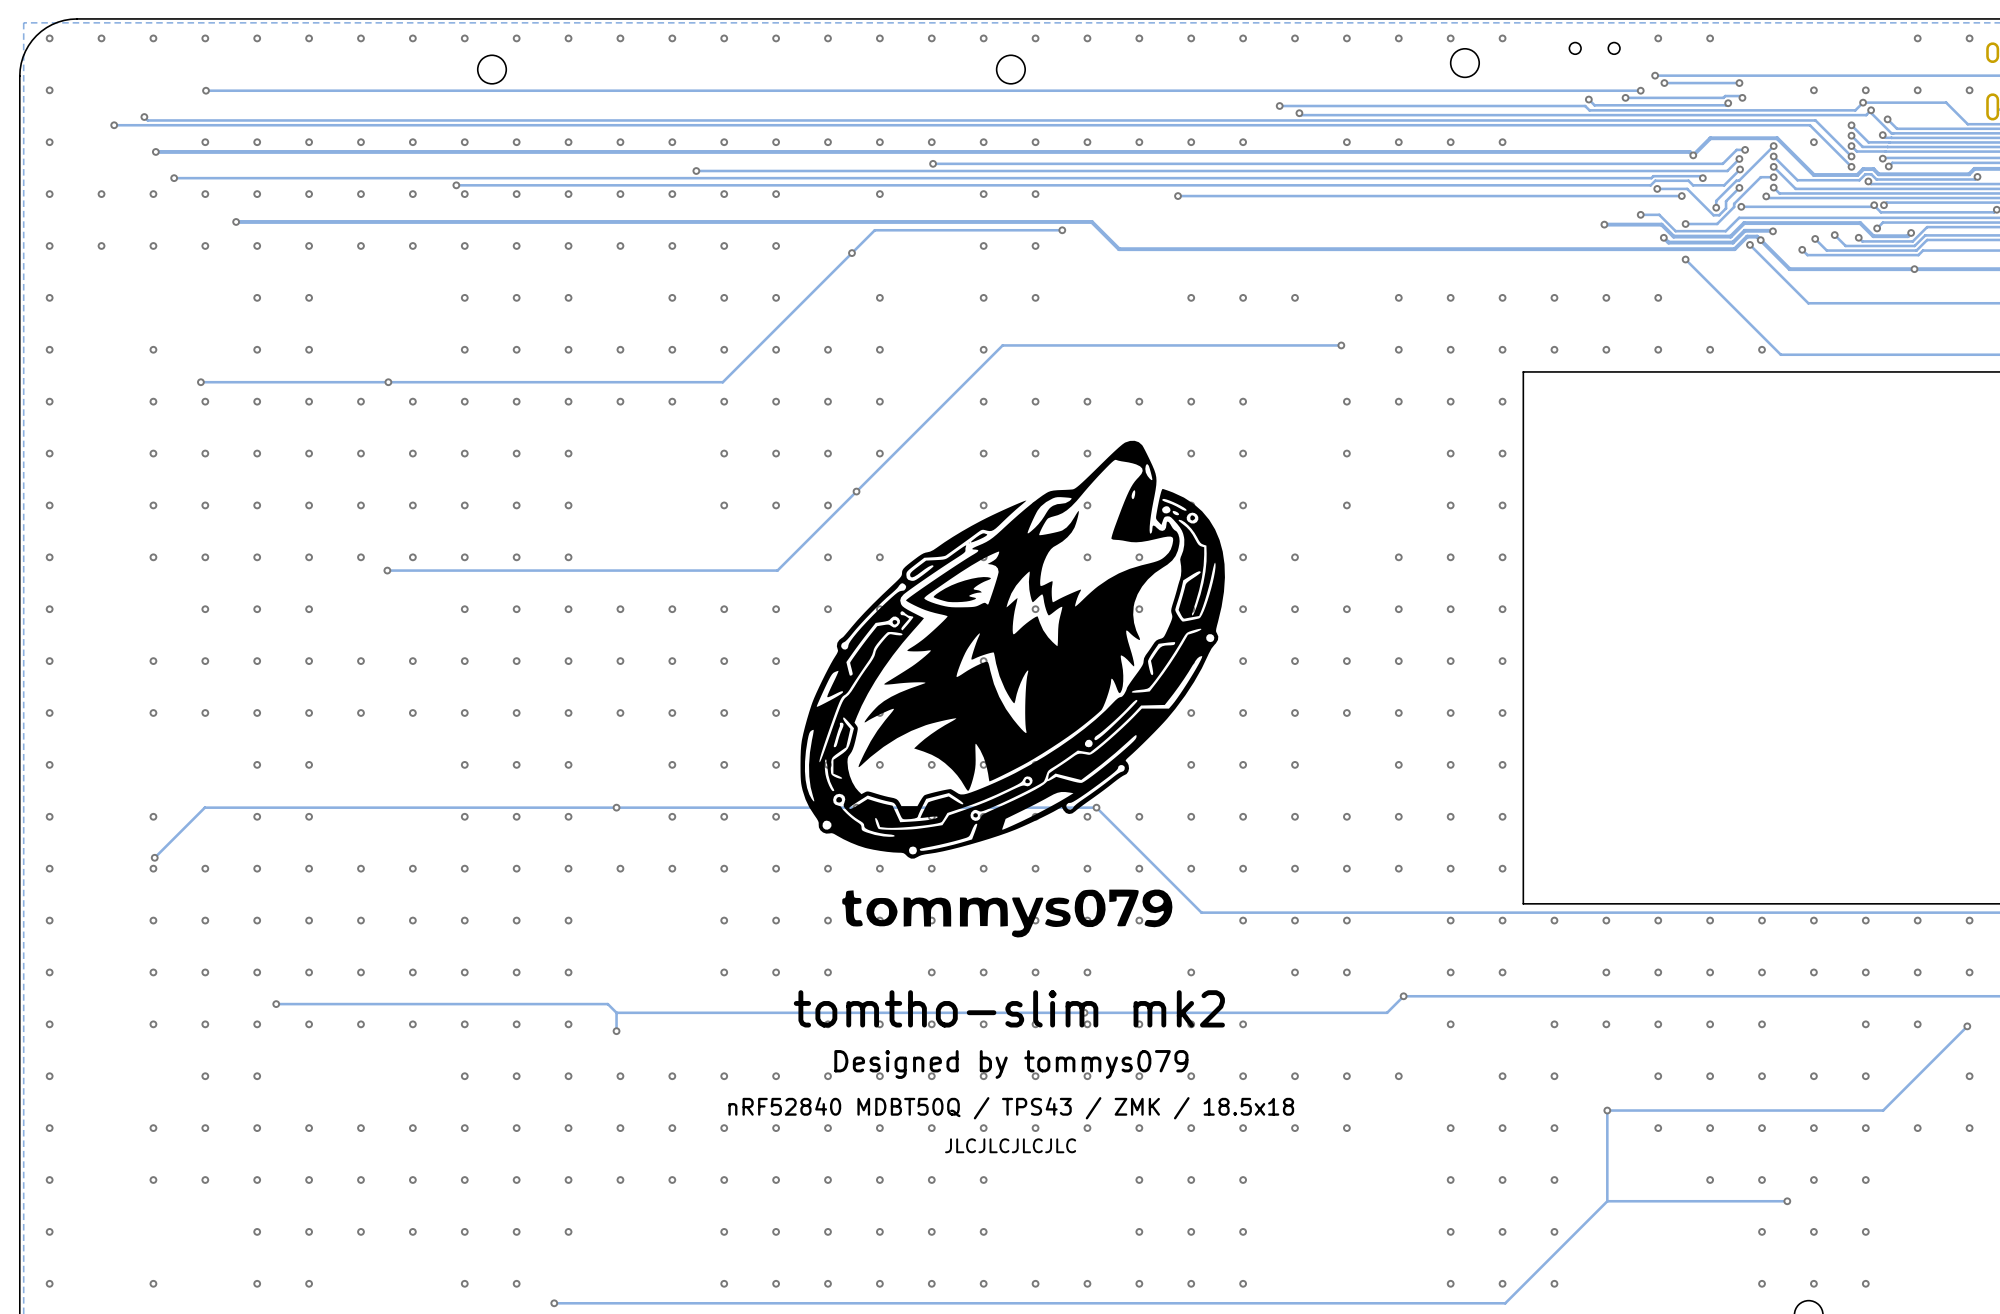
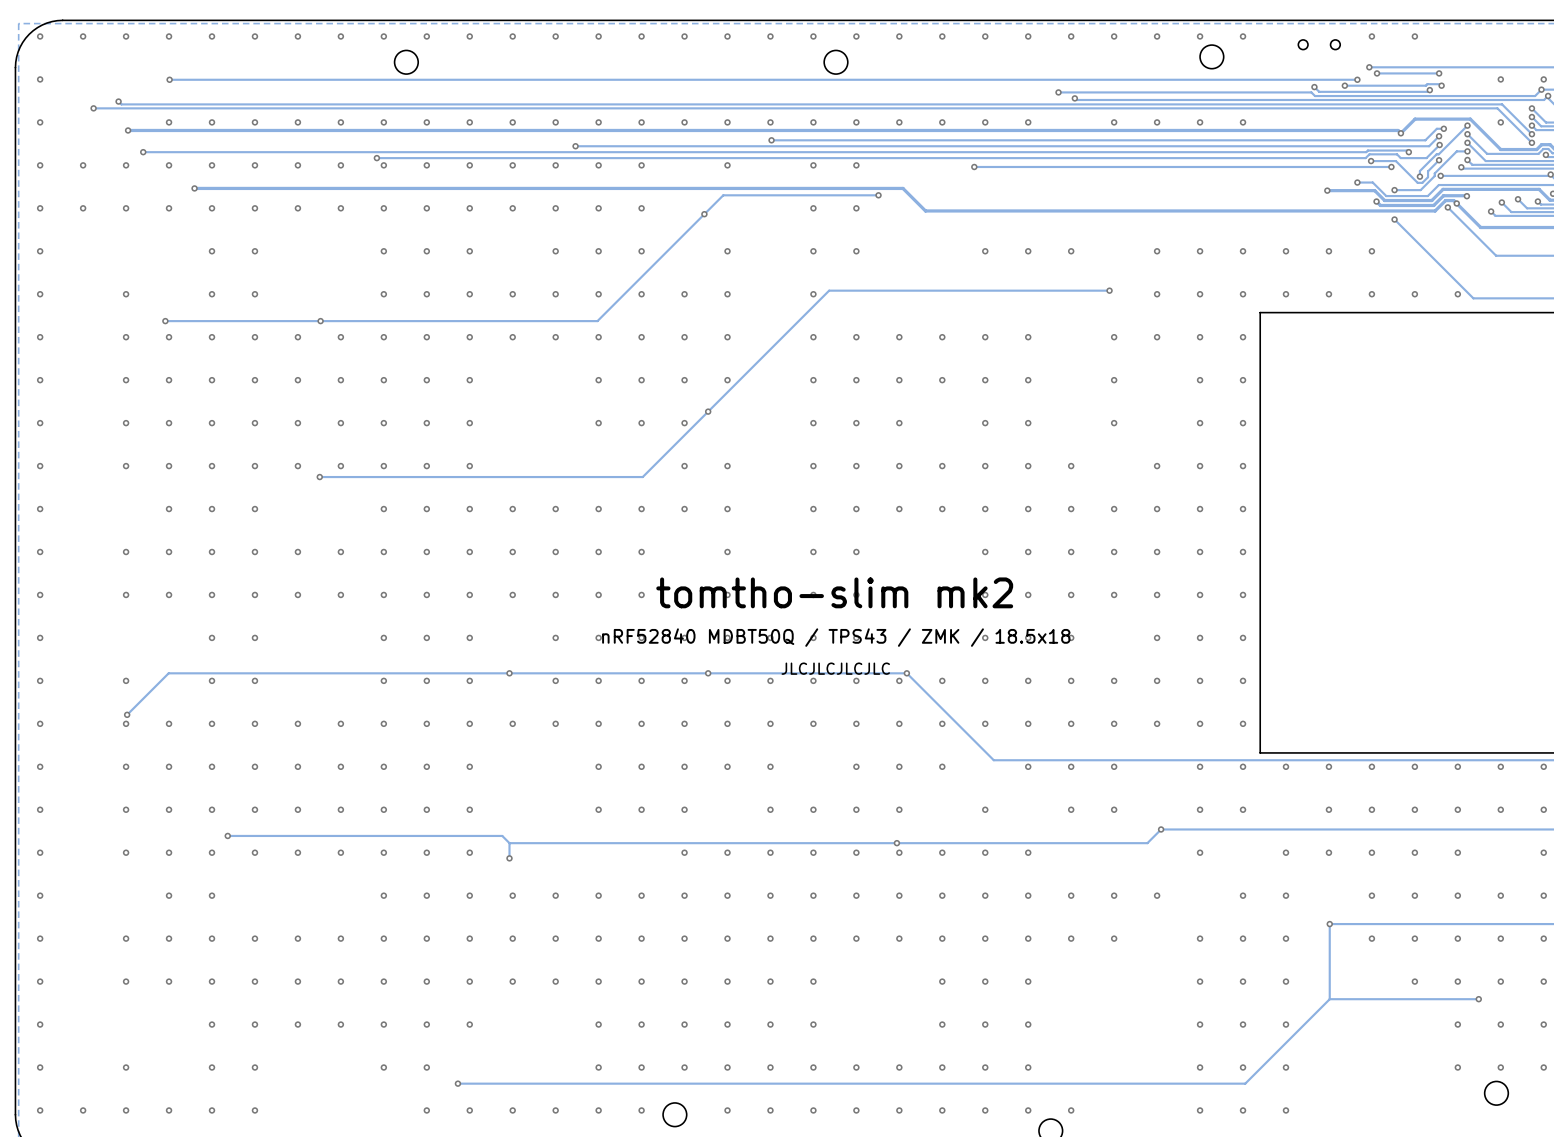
drawing: [800, 440, 1225, 859] -> none
text: none -> nRF52840 MDBT50Q / TPS43 / ZMK / 18.5x18 (836, 637)
text: none -> JLCJLCJLCJLC (835, 668)
drawing: [842, 889, 1173, 938] -> none
text position: tomtho-slim mk2 (1009, 1008) -> tomtho-slim mk2 (834, 592)
text: Designed by tommys079 (1011, 1064) -> none
text: nRF52840 MDBT50Q / TPS43 / ZMK / 18.5x18 (1011, 1108) -> none
text: JLCJLCJLCJLC (1010, 1145) -> none

